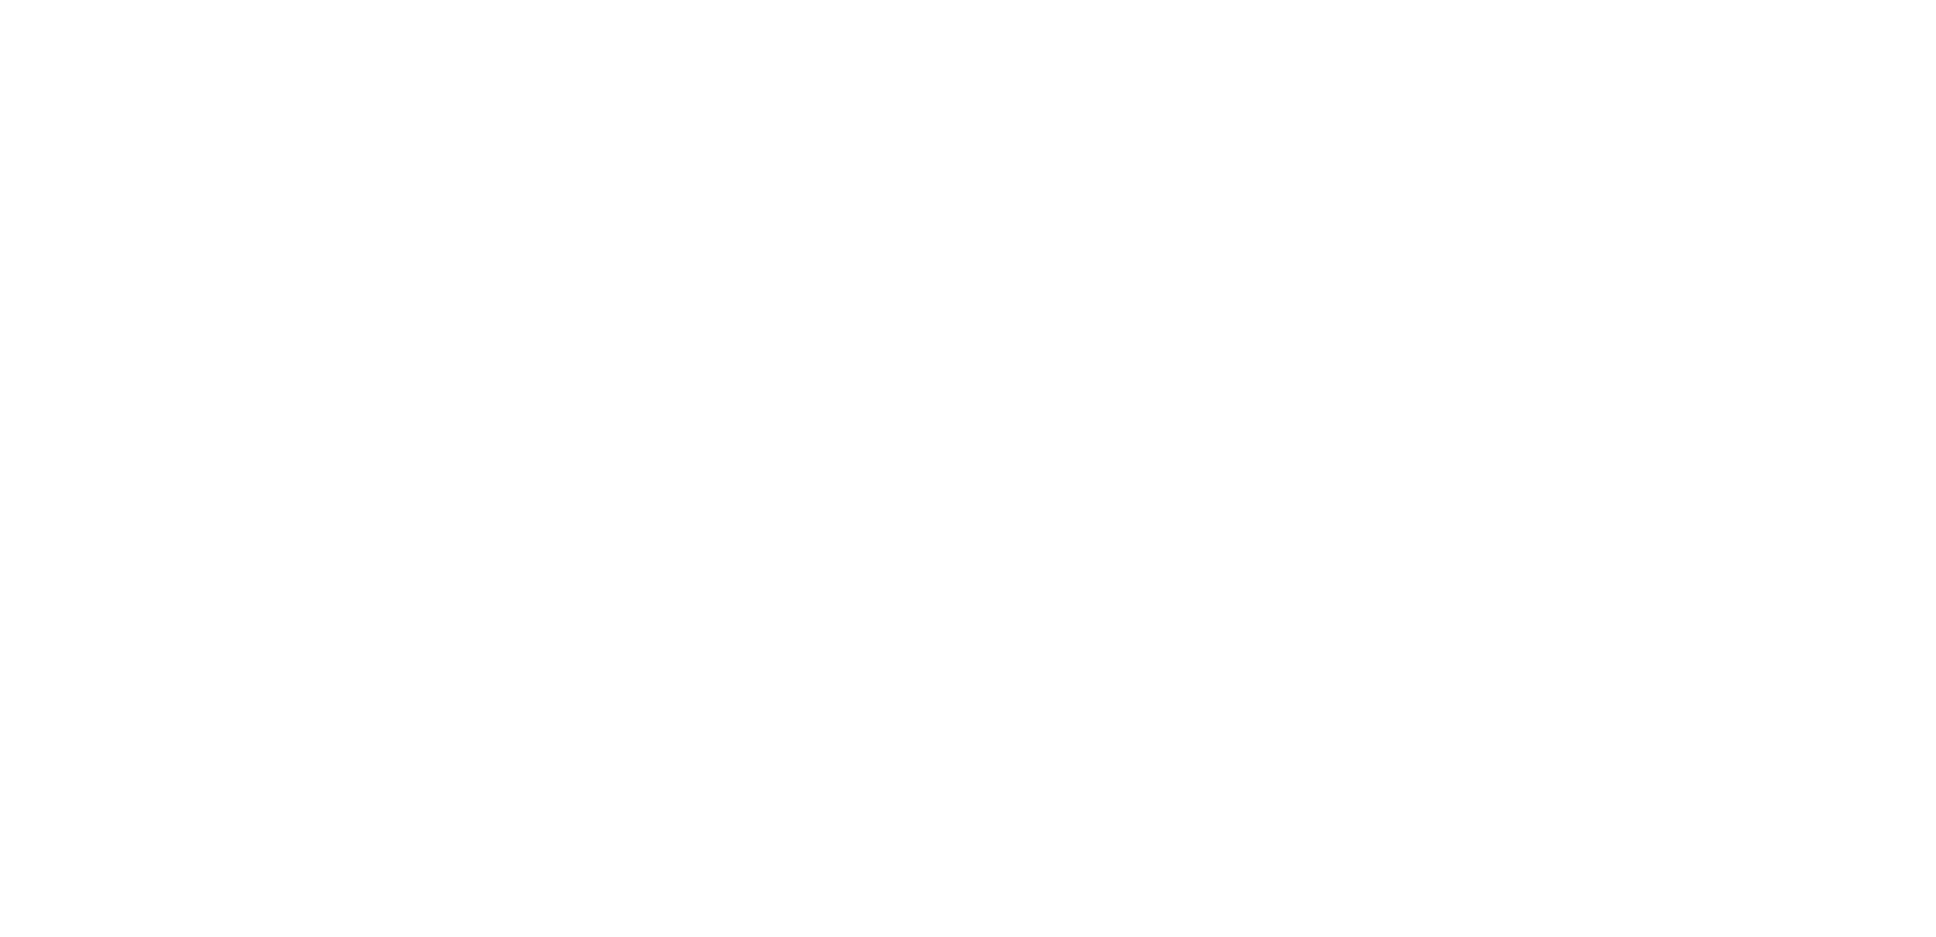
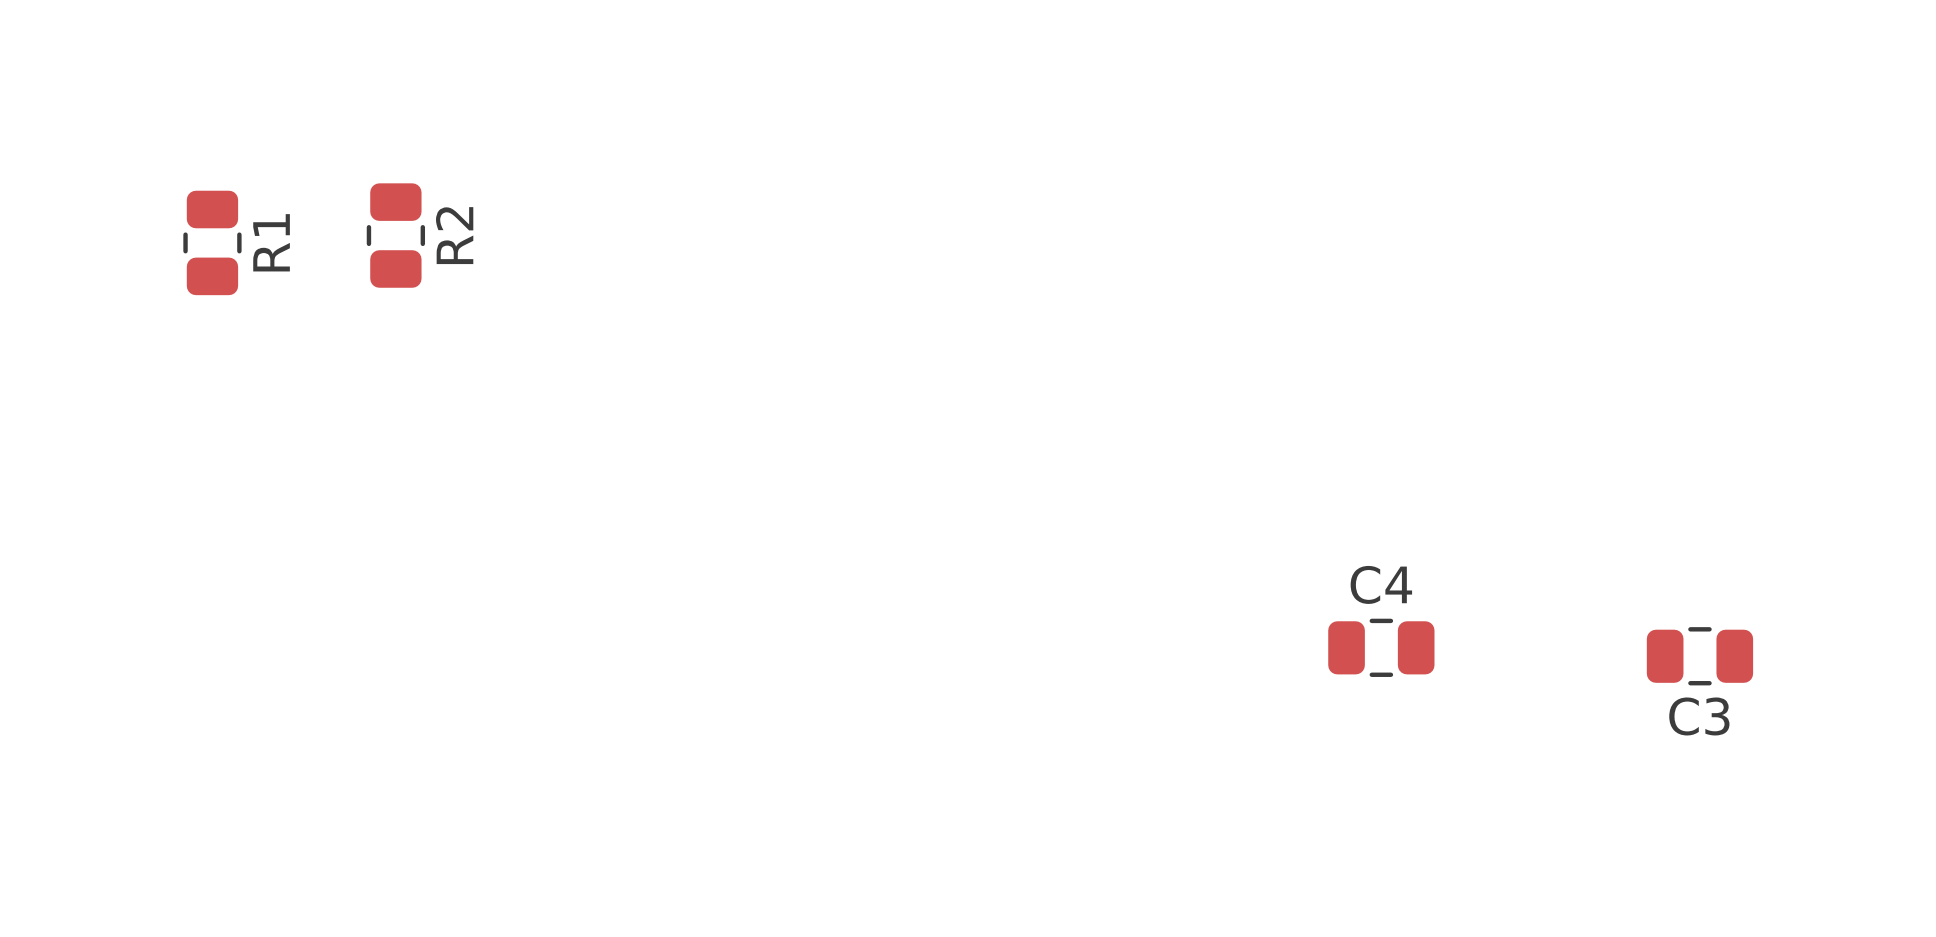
R2: none -> (395, 235)
R1: none -> (212, 242)
C4: none -> (1381, 647)
C3: none -> (1699, 656)

